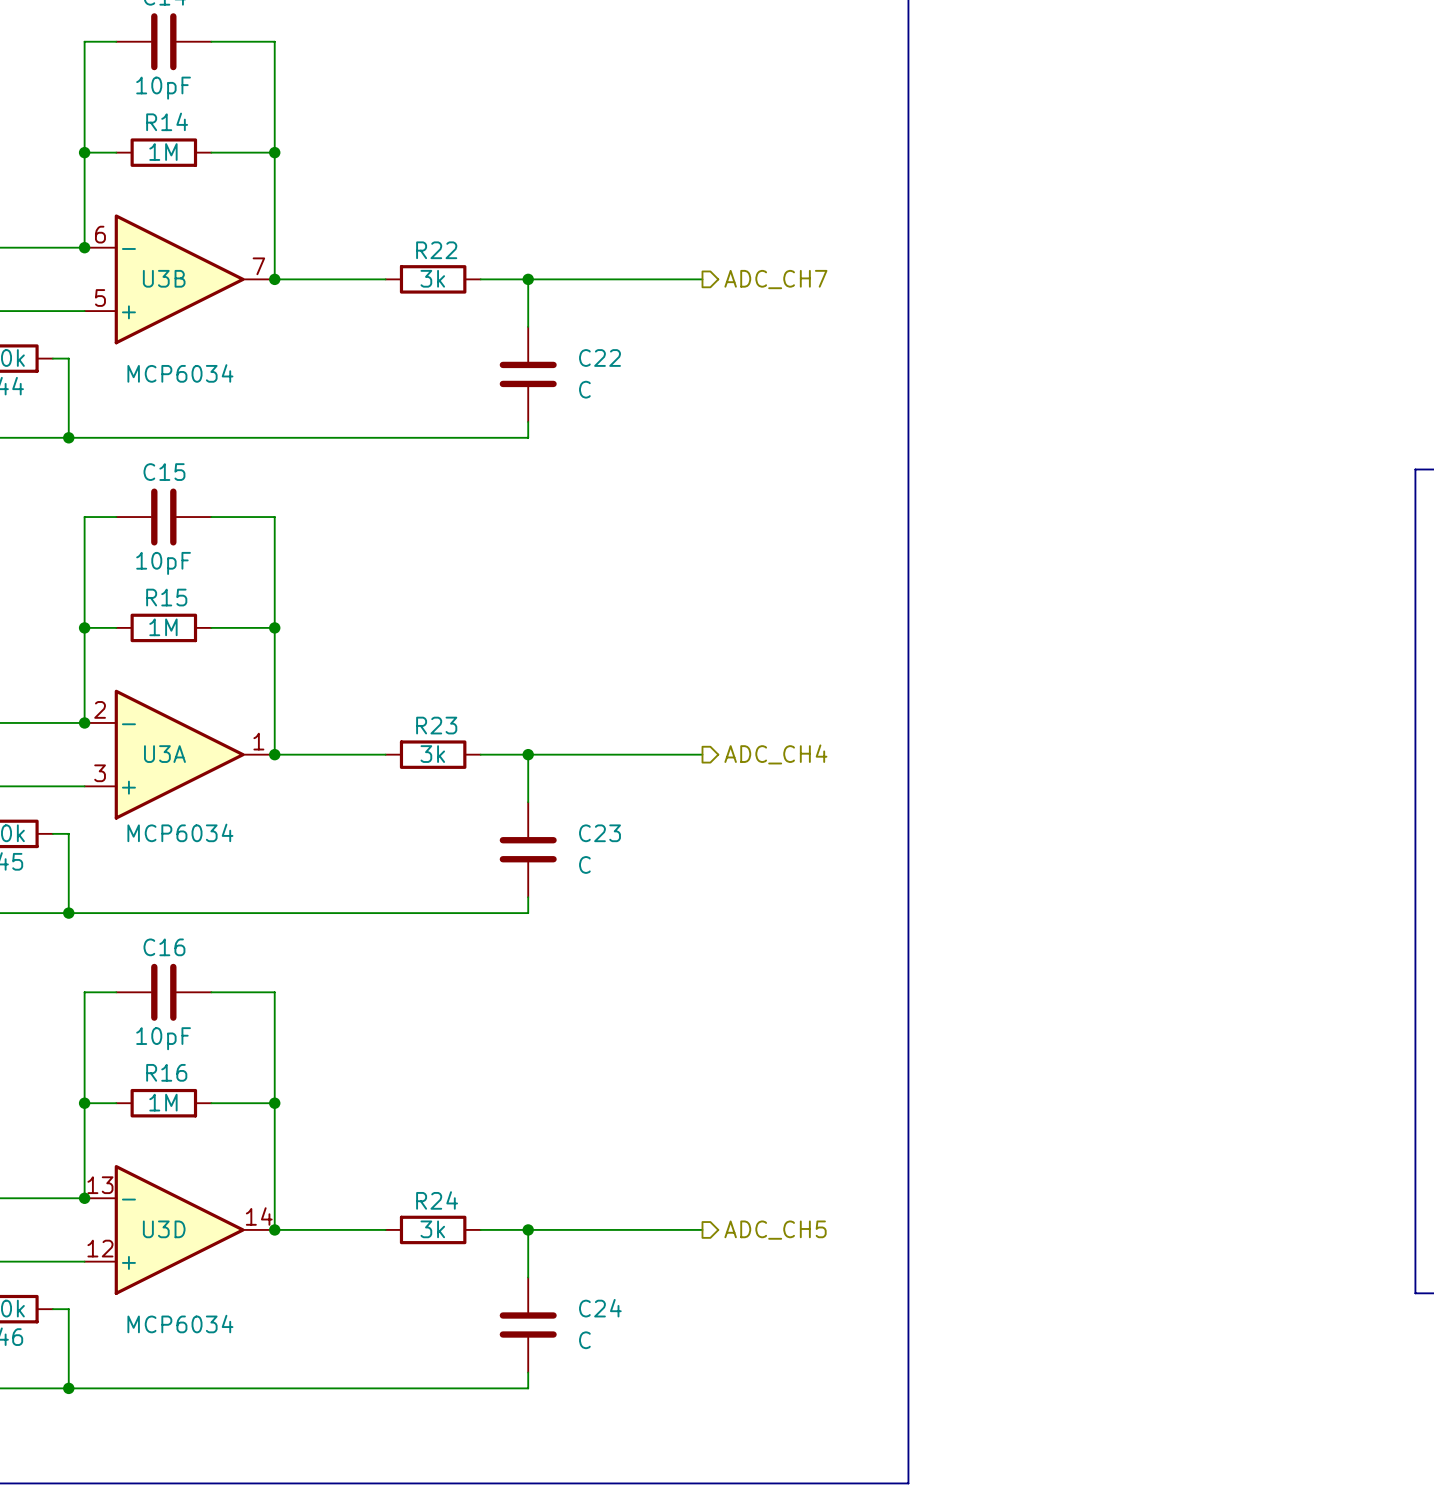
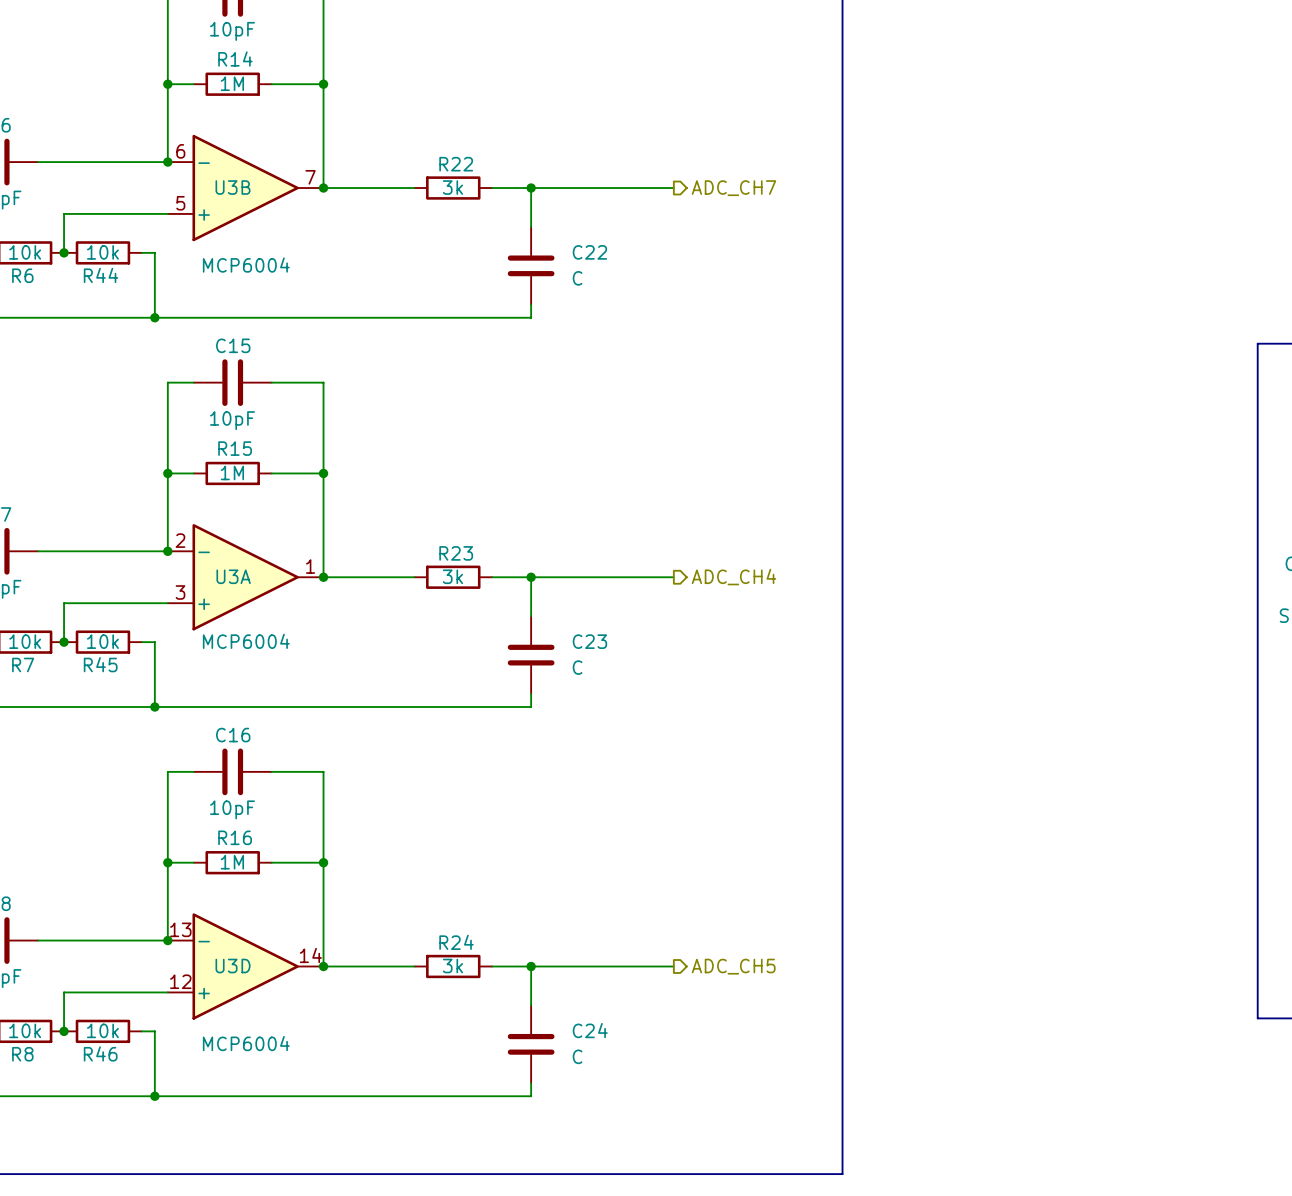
U3B value: MCP6034 (180, 373) -> MCP6004 (246, 265)
U3A value: MCP6034 (180, 832) -> MCP6004 (246, 641)
U3D value: MCP6034 (180, 1324) -> MCP6004 (246, 1043)

